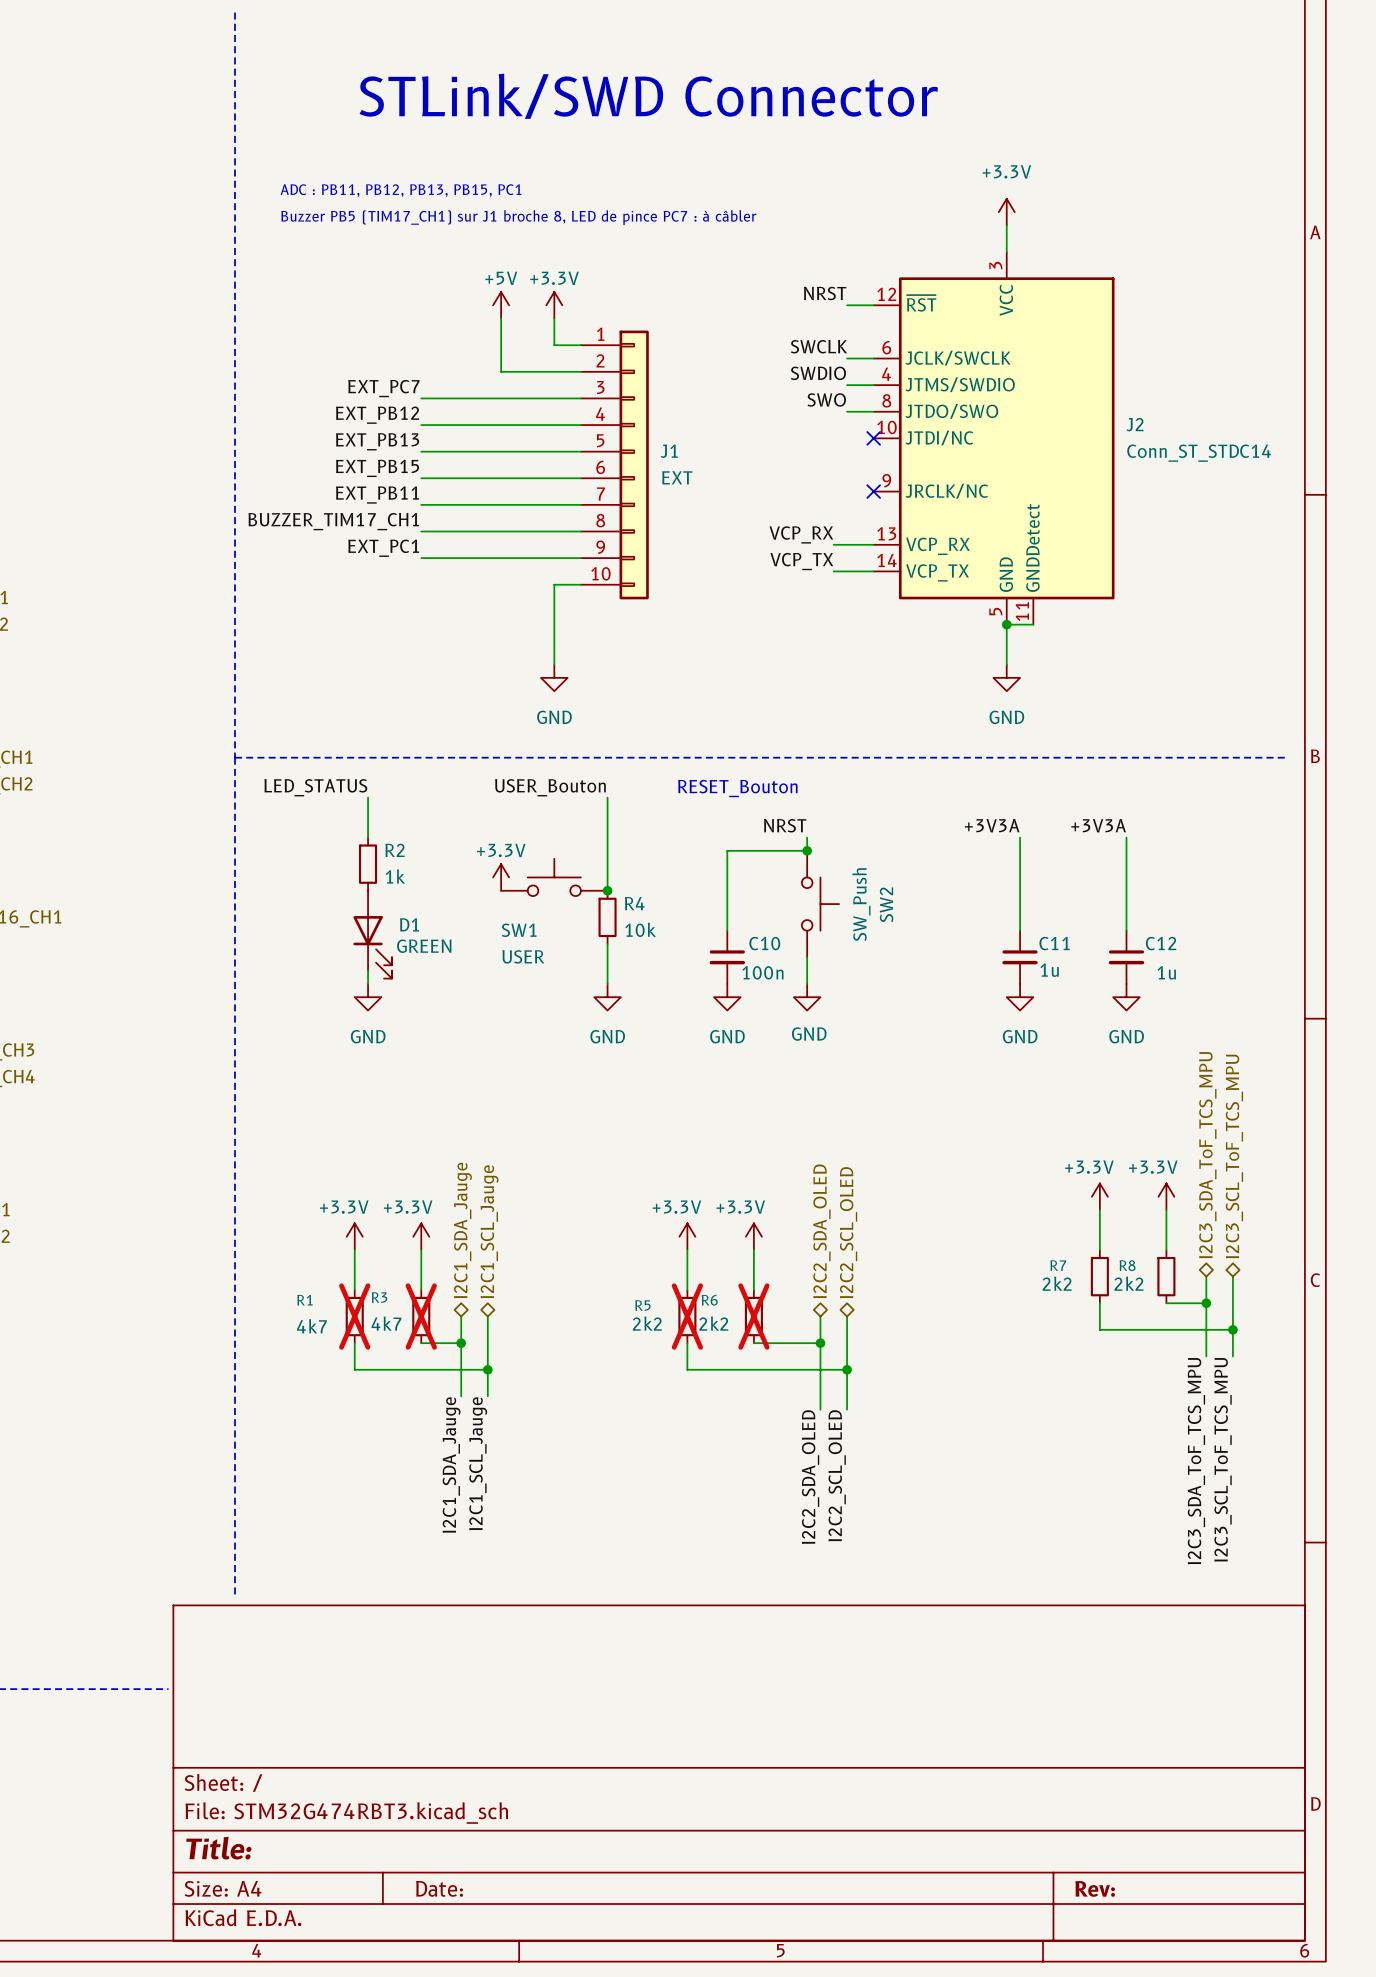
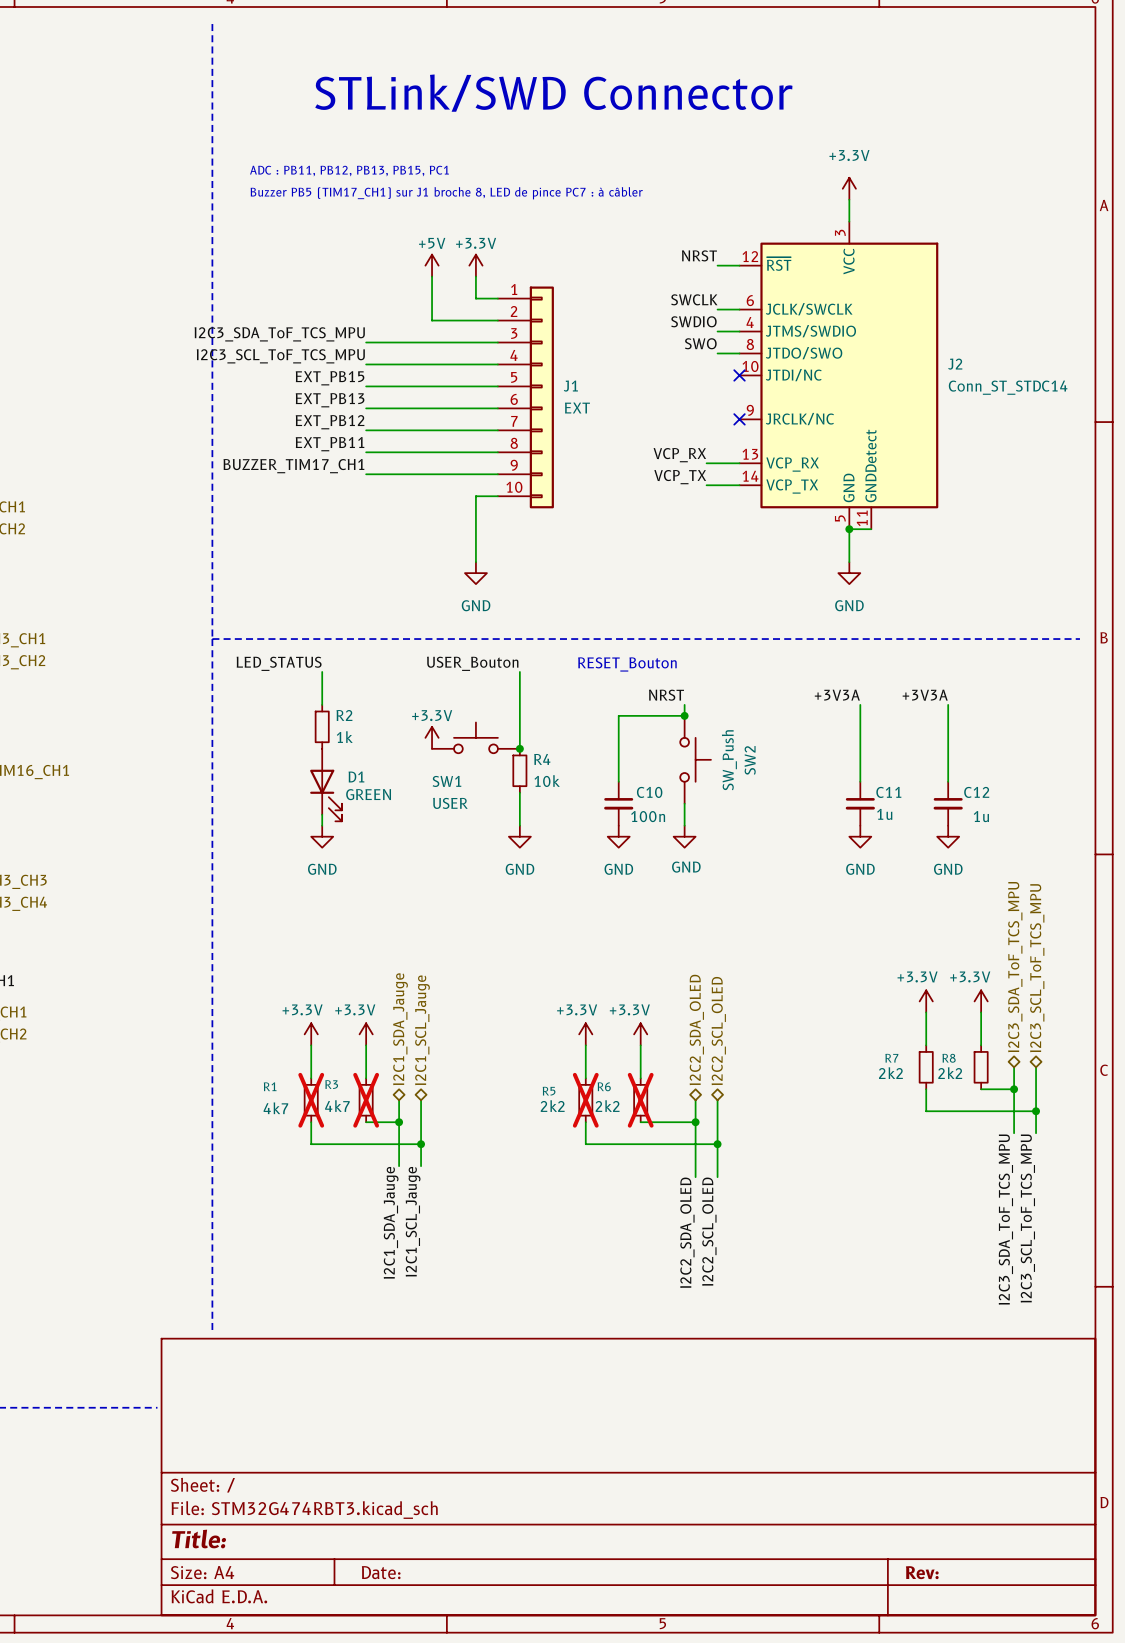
label: EXT_PC7 (383, 388) -> I2C3_SDA_ToF_TCS_MPU (279, 334)
label: EXT_PB12 (377, 415) -> I2C3_SCL_ToF_TCS_MPU (280, 356)
label: EXT_PB13 (377, 441) -> EXT_PB15 (330, 378)
label: EXT_PB15 (377, 468) -> EXT_PB13 (330, 400)
label: EXT_PB11 (377, 495) -> EXT_PB12 (330, 422)
label: BUZZER_TIM17_CH1 (333, 521) -> EXT_PB11 (330, 444)
label: EXT_PC1 (383, 548) -> BUZZER_TIM17_CH1 (293, 466)

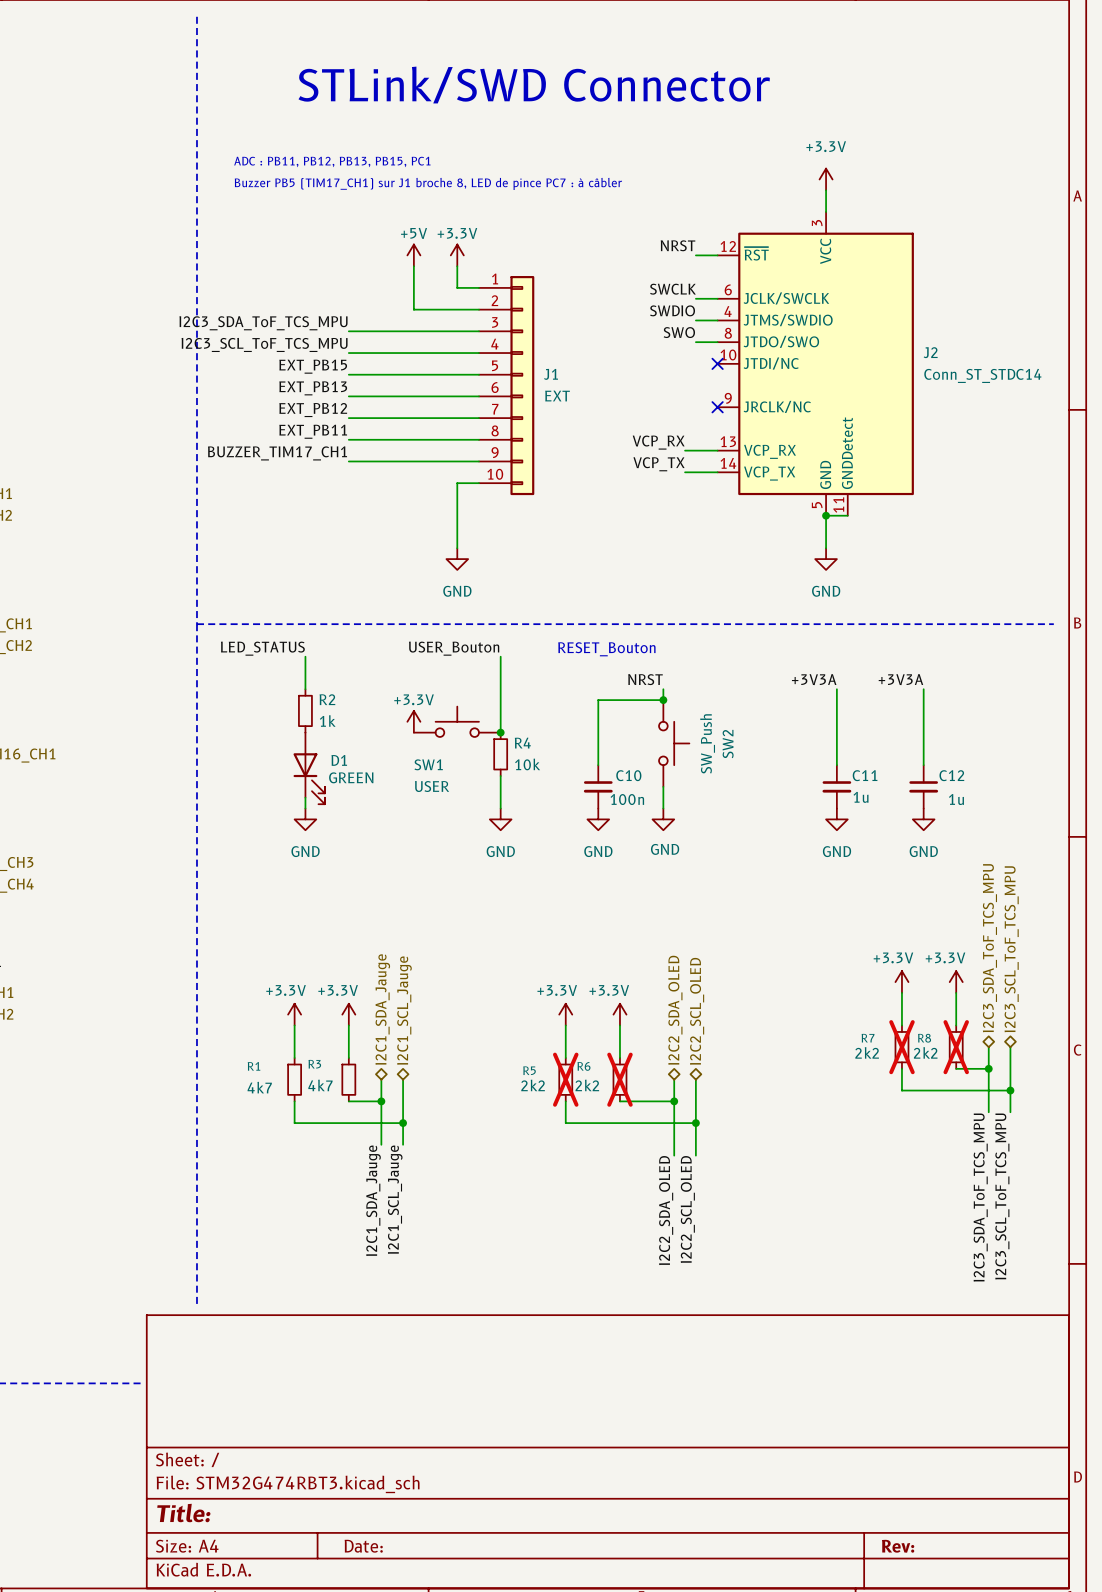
R7 do-not-place cross: none -> (901, 1047)
R8 do-not-place cross: none -> (956, 1047)
R1 do-not-place cross: (311, 1100) -> none
R3 do-not-place cross: (366, 1100) -> none

